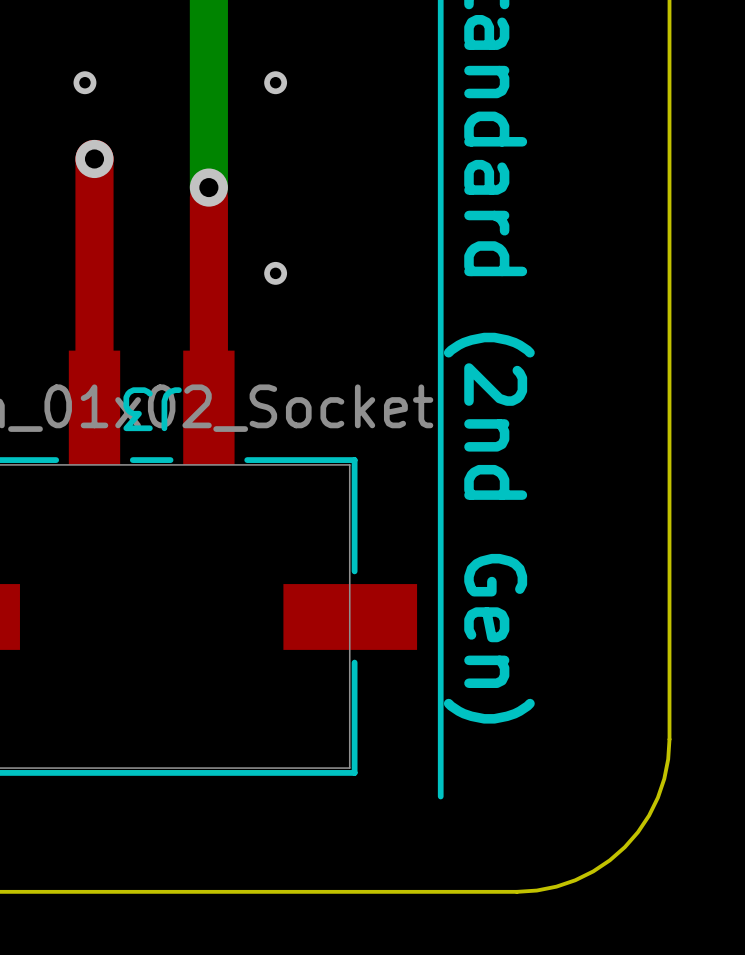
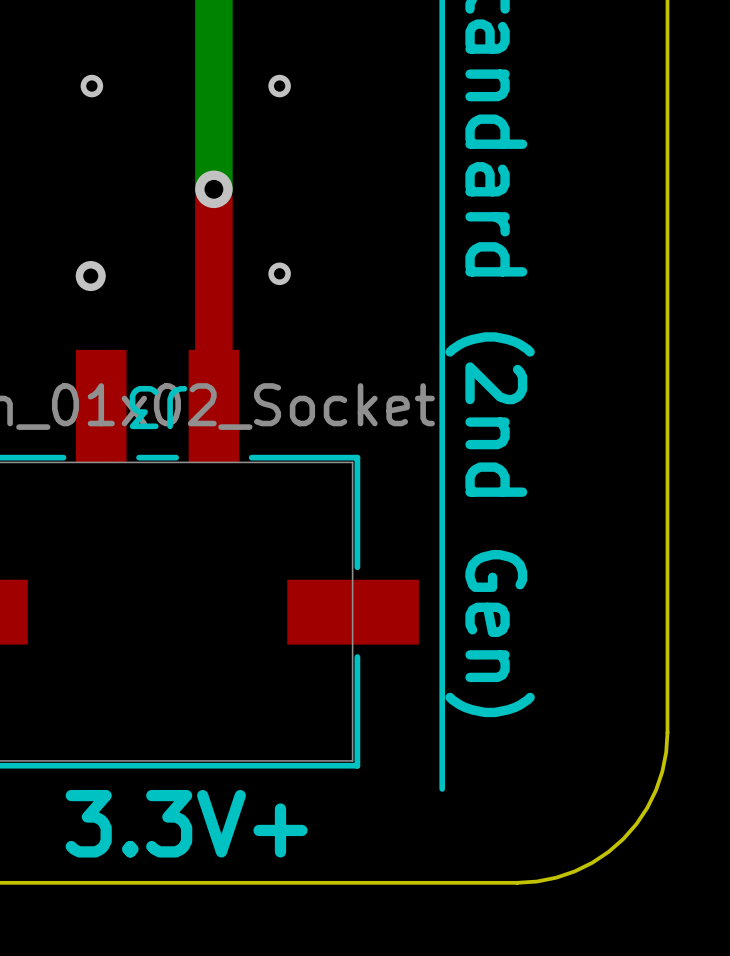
top track: (94, 158) (94, 407) -> none
via: (94, 158) -> none
via: none -> (90, 276)
text: none -> 3.3V+ (186, 823)

